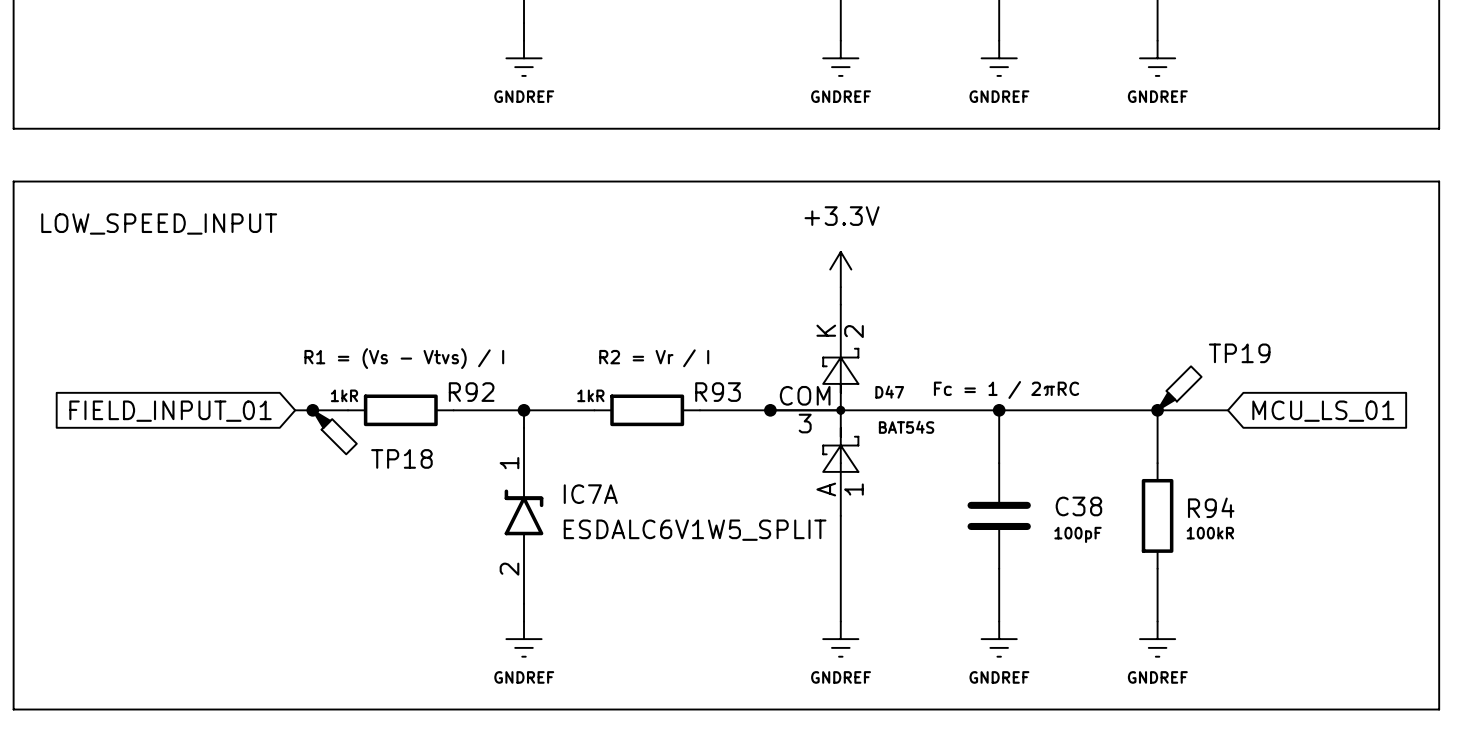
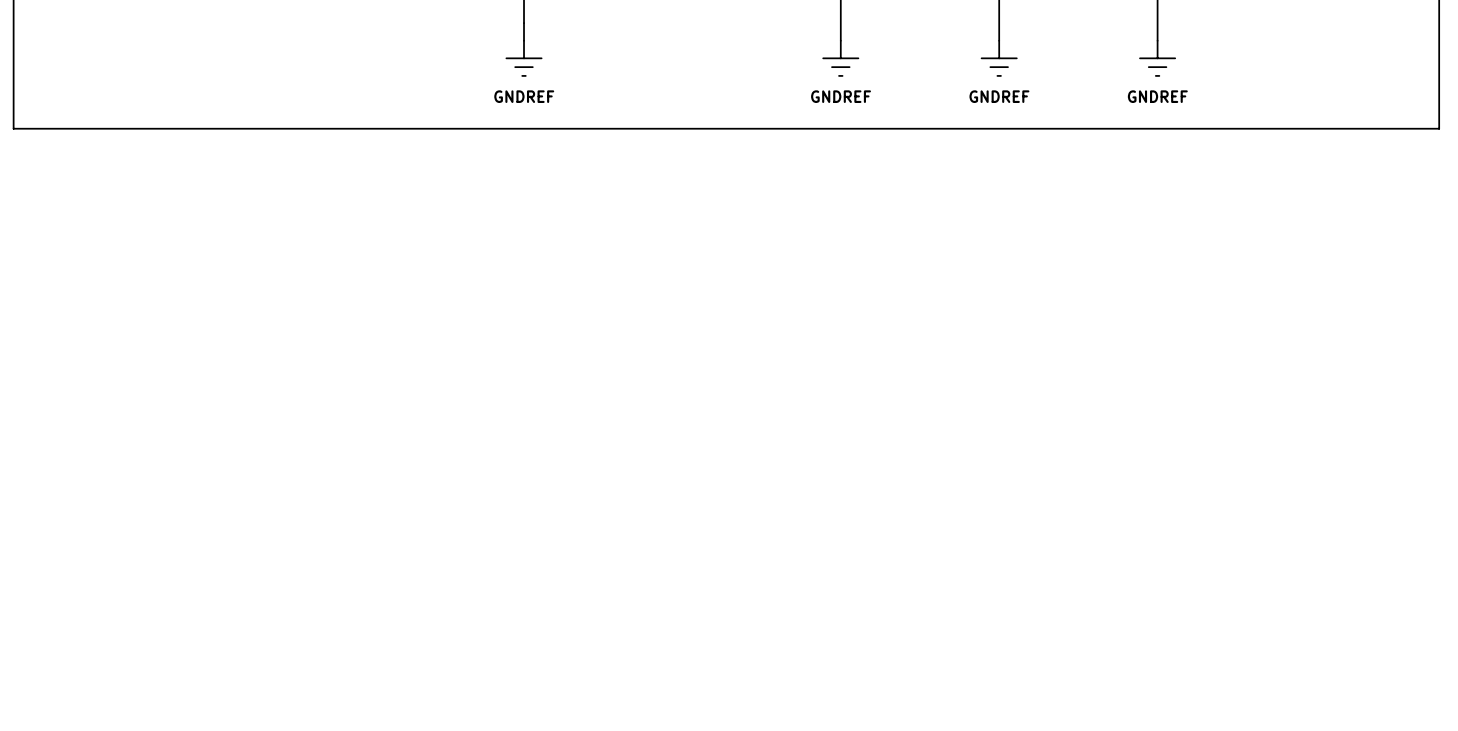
line: (13, 181) (13, 709) (1439, 709) (1439, 181) (13, 181) -> none
text: LOW_SPEED_INPUT (159, 224) -> none
power symbol: +3.3V (840, 269) -> none
wire: (840, 287) (840, 304) -> none
text: R1 = (Vs - Vtvs) / I (404, 358) -> none
text: R2 = Vr / I (654, 358) -> none
TP19: (1179, 388) -> none
text: Fc = 1 / 2πRC (1006, 389) -> none
wire: (295, 410) (348, 410) -> none
junction: (312, 410) -> none
R92: 1kR (400, 410) -> none
wire: (453, 410) (594, 410) -> none
wire: (524, 410) (524, 427) -> none
junction: (524, 410) -> none
R93: 1kR (647, 410) -> none
wire: (700, 410) (1227, 410) -> none
junction: (770, 410) -> none
D47: BAT54S (814, 410) -> none
wire: (999, 410) (999, 463) -> none
junction: (999, 410) -> none
wire: (1157, 410) (1157, 463) -> none
junction: (1157, 410) -> none
global label: FIELD_INPUT_01 (170, 411) -> none
global label: MCU_LS_01 (1323, 411) -> none
TP18: (334, 432) -> none
IC7A: ESDALC6V1W5_SPLIT (524, 515) -> none
wire: (840, 515) (840, 621) -> none
C38: 100pF (999, 515) -> none
R94: 100kR (1157, 515) -> none
wire: (999, 568) (999, 621) -> none
wire: (1157, 568) (1157, 621) -> none
wire: (524, 603) (524, 621) -> none
power symbol: GNDREF (524, 639) -> none
power symbol: GNDREF (840, 639) -> none
power symbol: GNDREF (999, 639) -> none
power symbol: GNDREF (1157, 639) -> none

